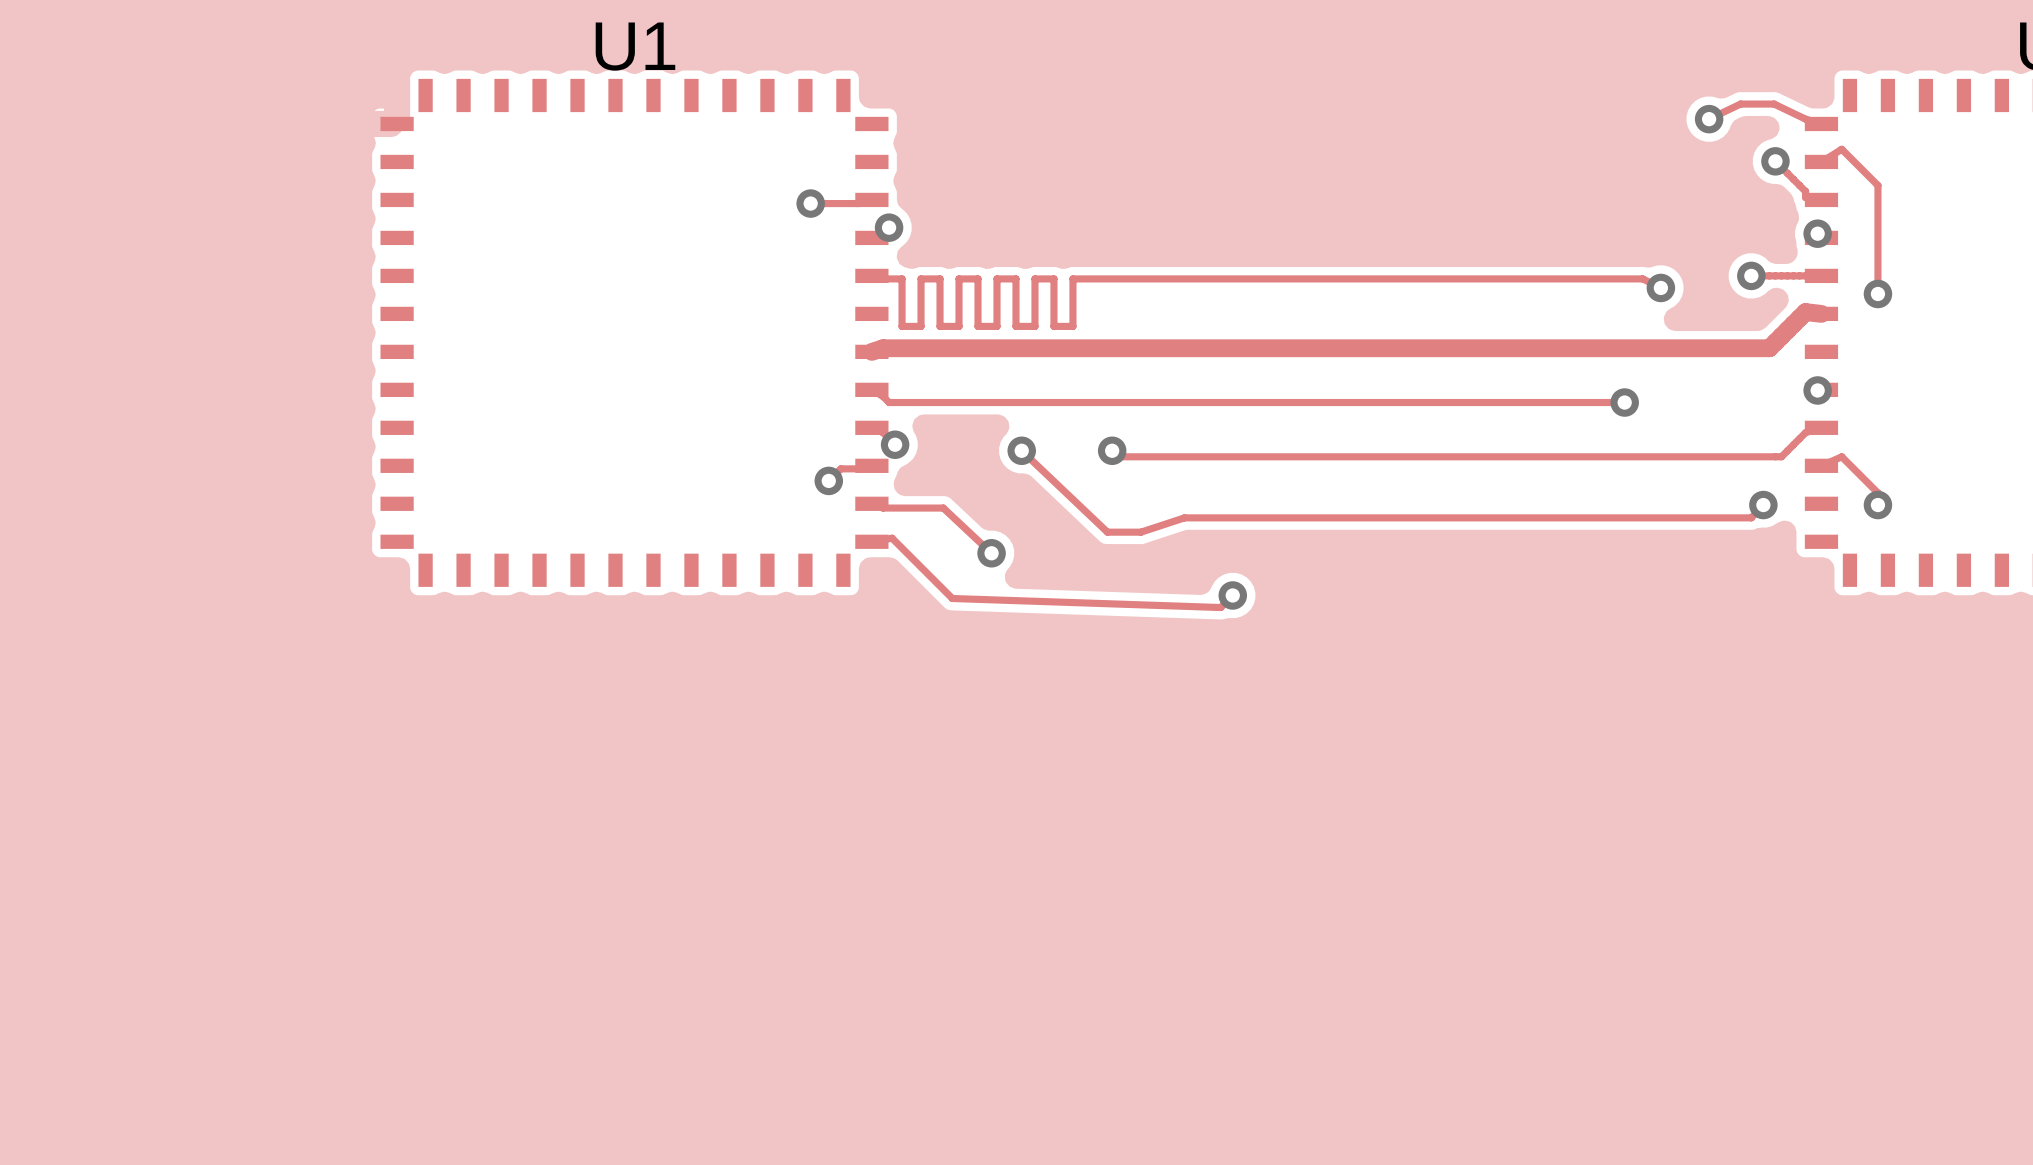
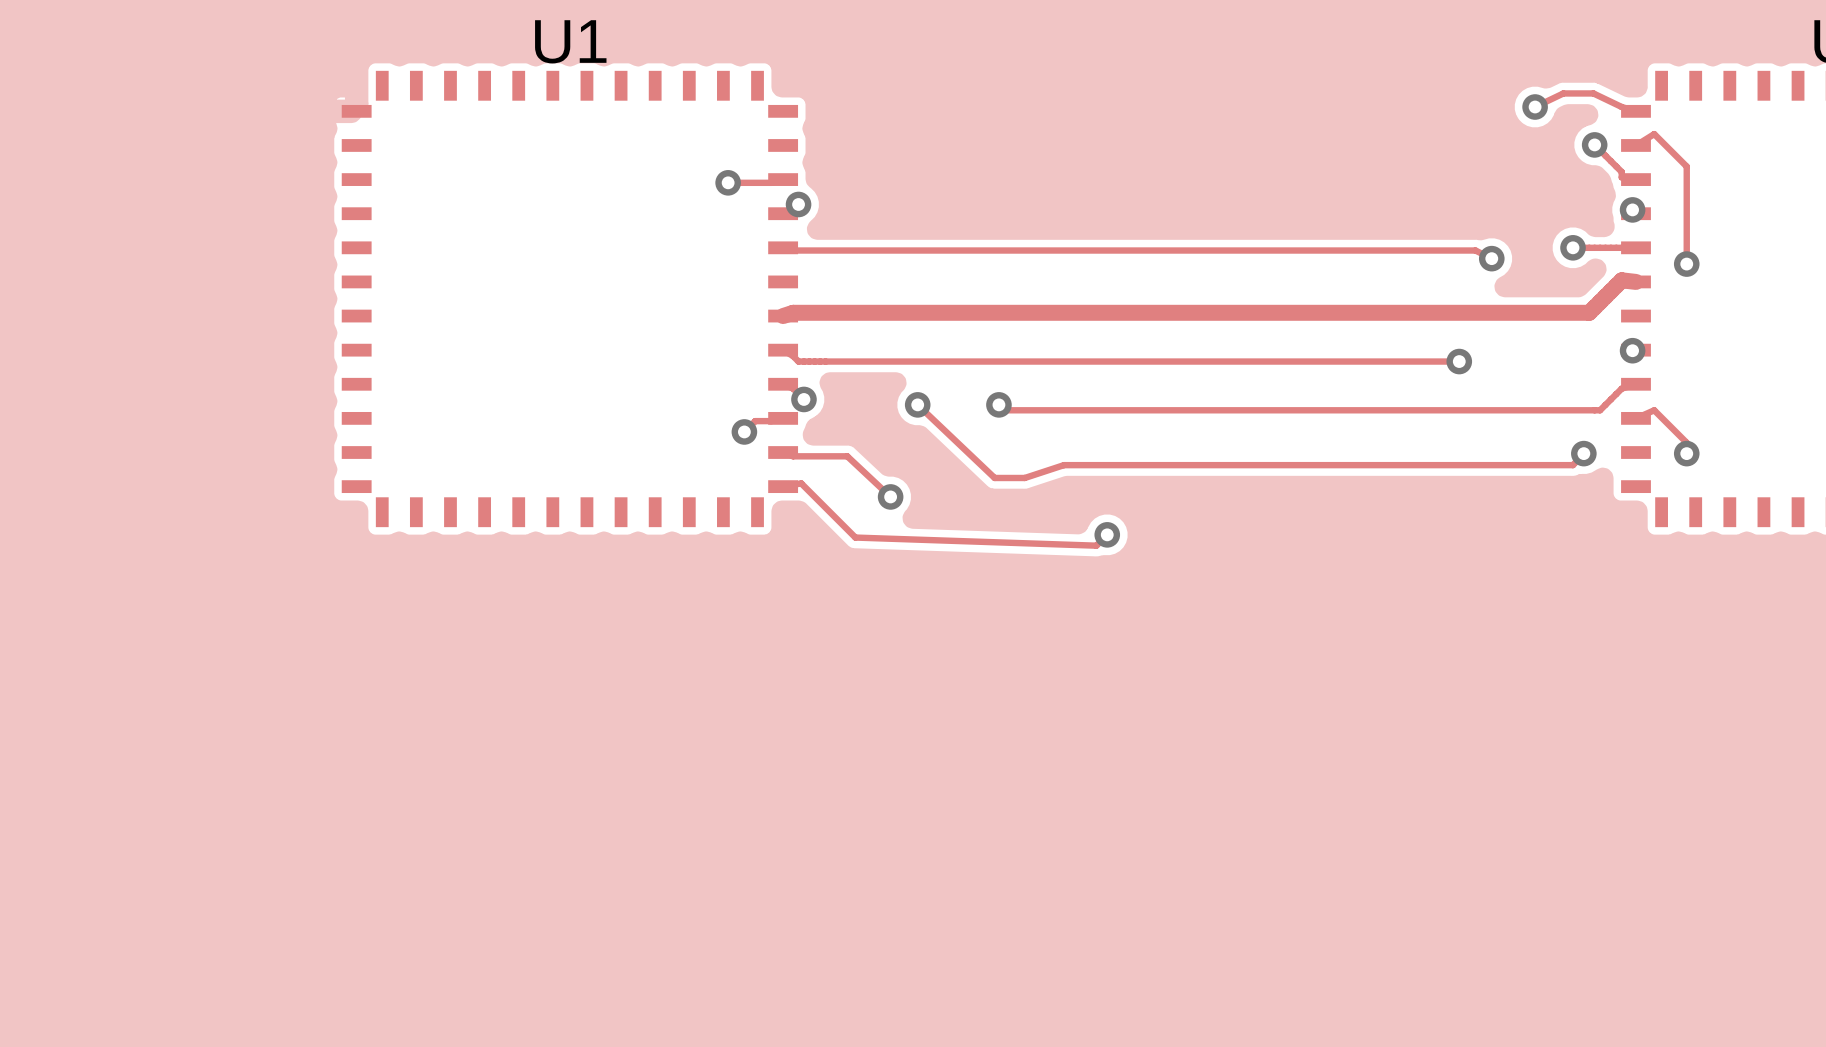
track: (902, 278) (902, 326) (921, 326) (921, 278) -> (810, 250) (827, 250)
track: (940, 278) (940, 326) (959, 326) (959, 278) -> (844, 250) (861, 250)
track: (978, 278) (978, 326) (996, 326) (996, 278) -> (878, 250) (895, 250)
track: (1015, 278) (1015, 326) (1034, 326) (1034, 278) -> (912, 250) (929, 250)
track: (1053, 278) (1053, 326) (1072, 326) (1072, 278) -> (946, 250) (963, 250)

